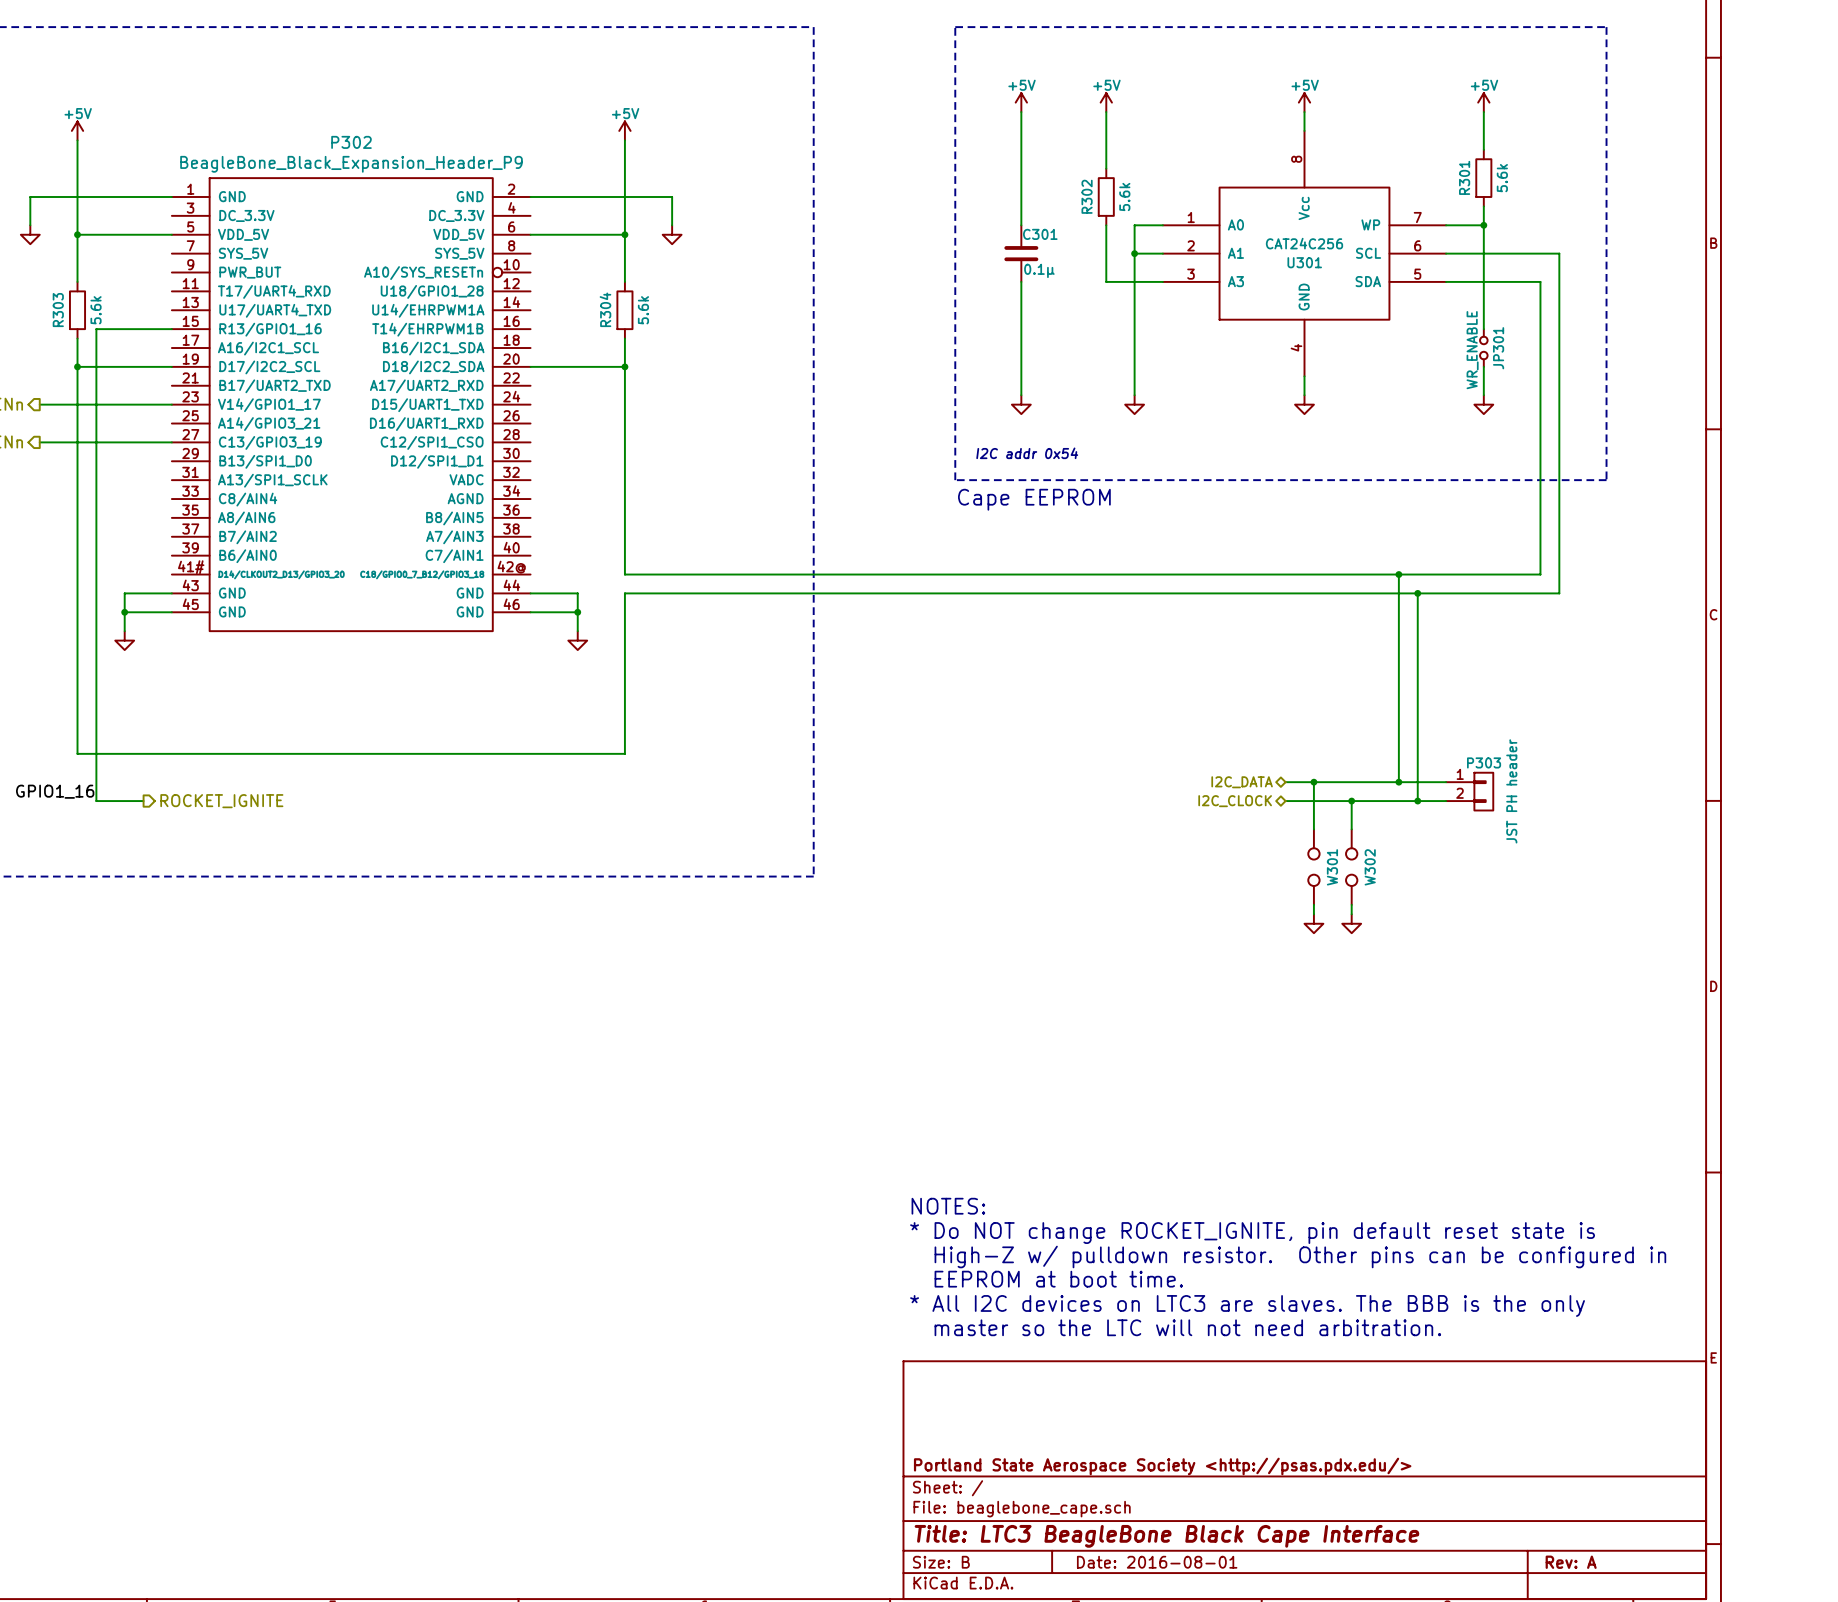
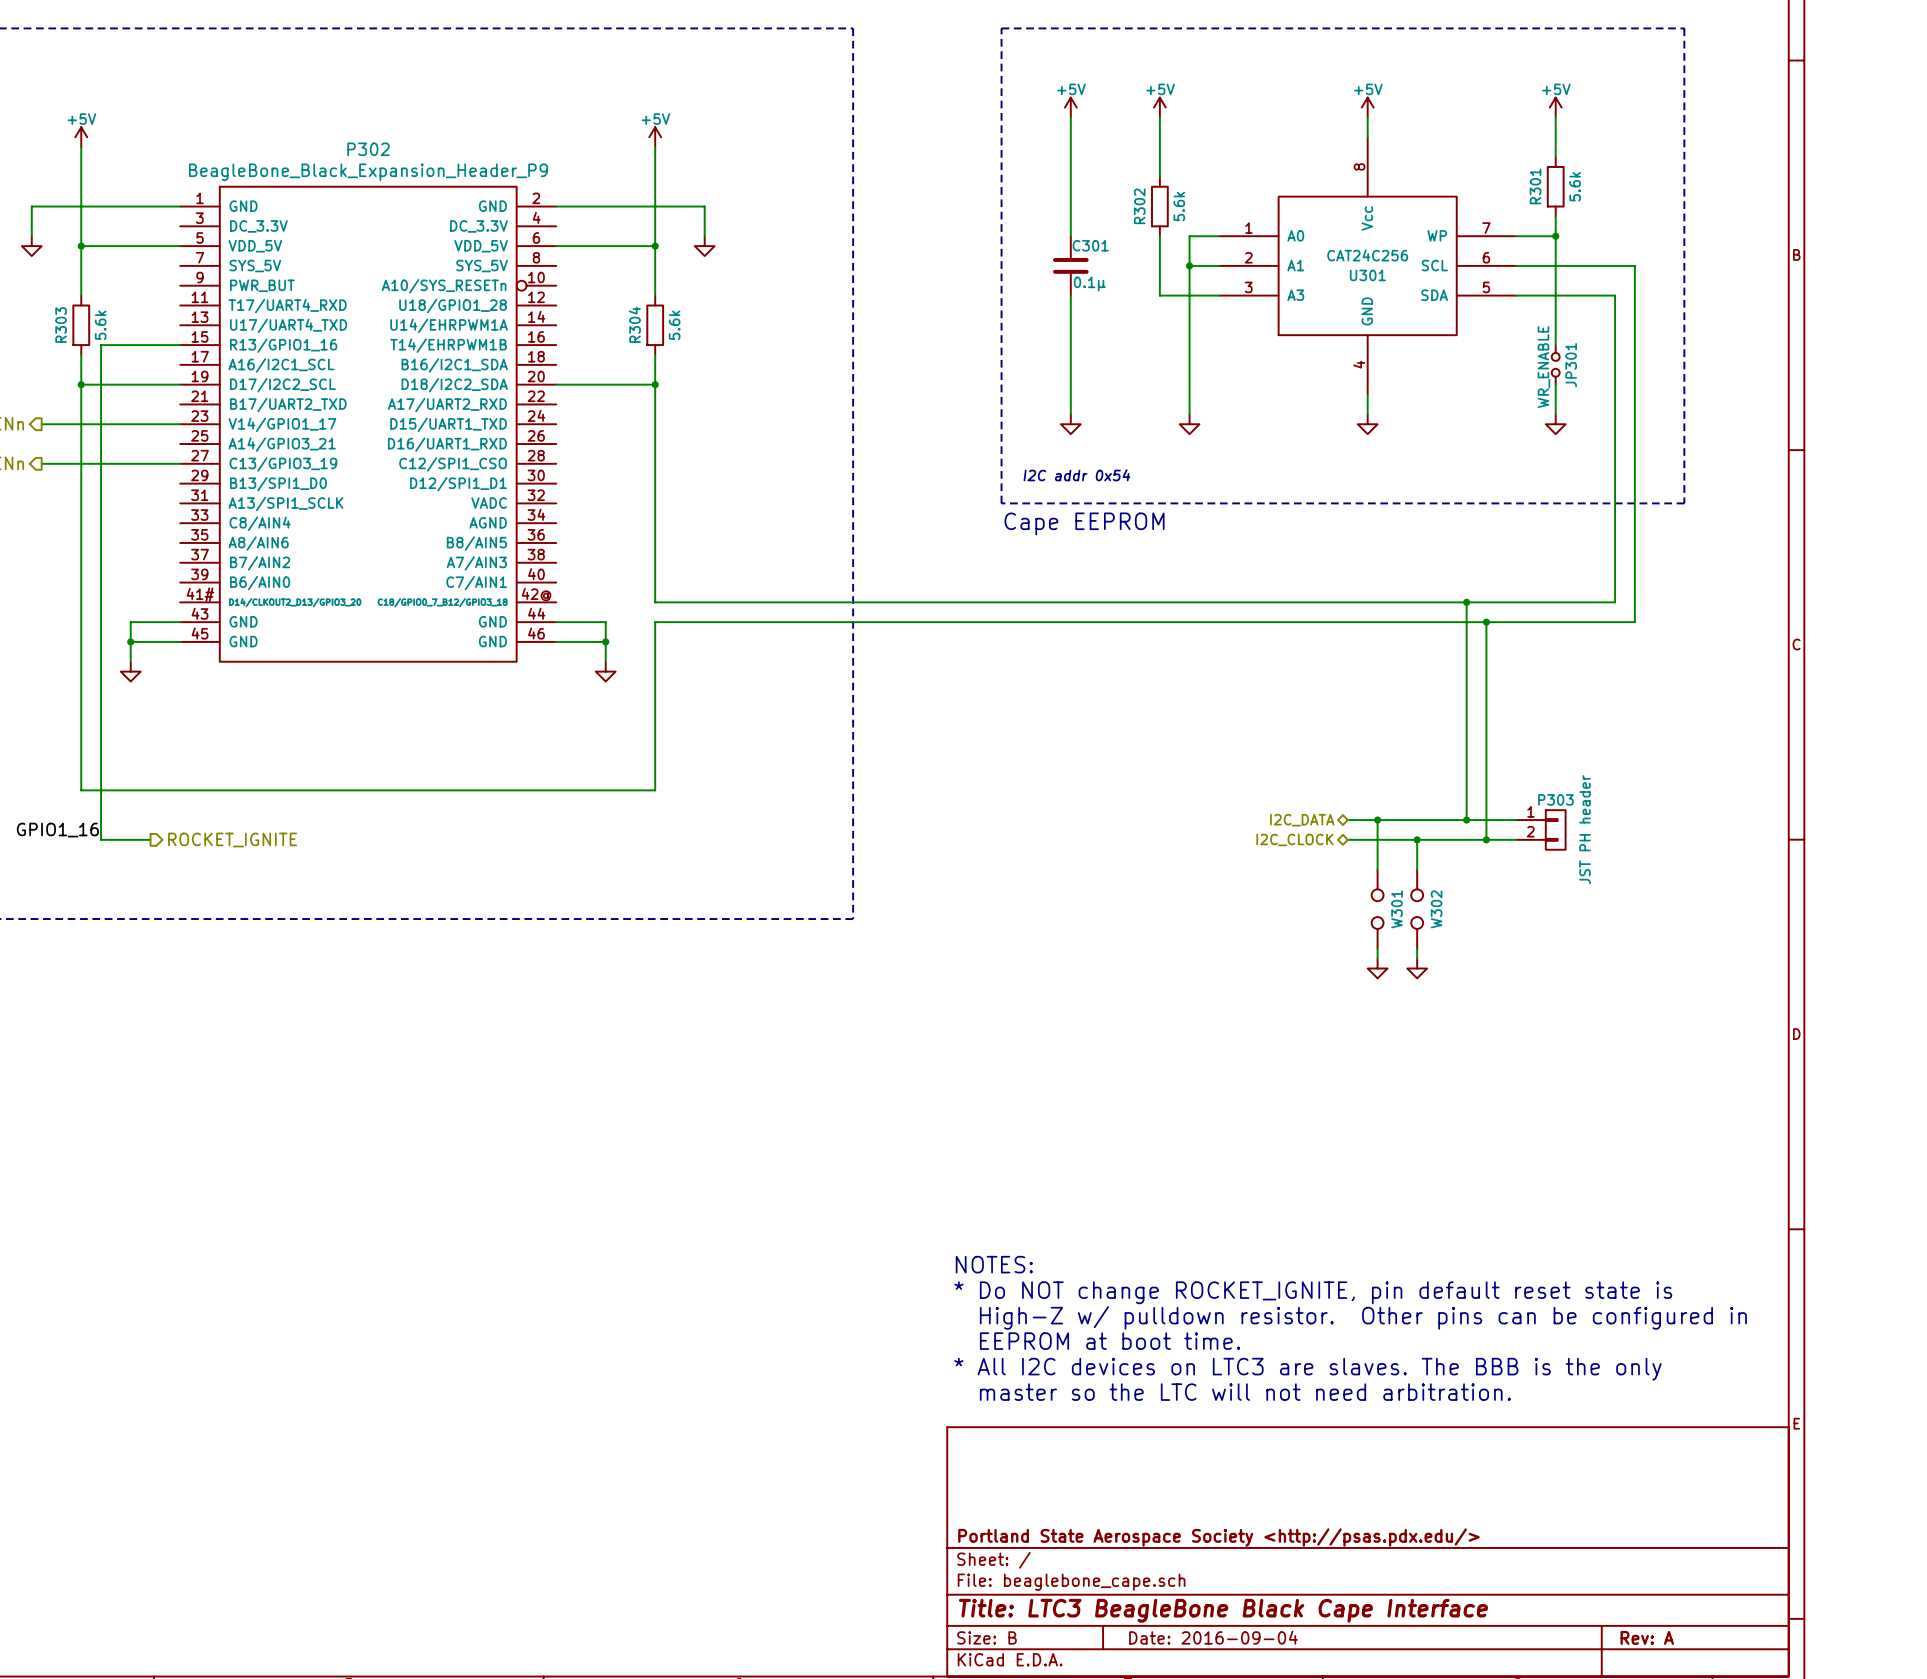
title block: Date: 2016-08-01 (1157, 1562) -> Date: 2016-09-04 (1213, 1637)

